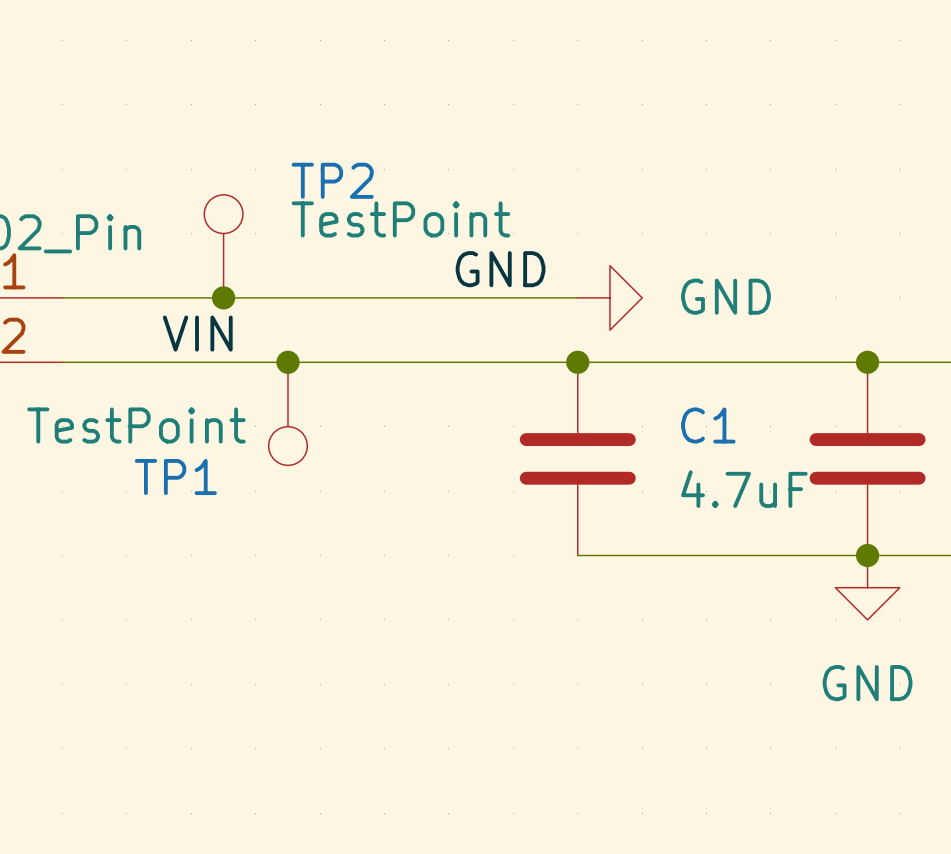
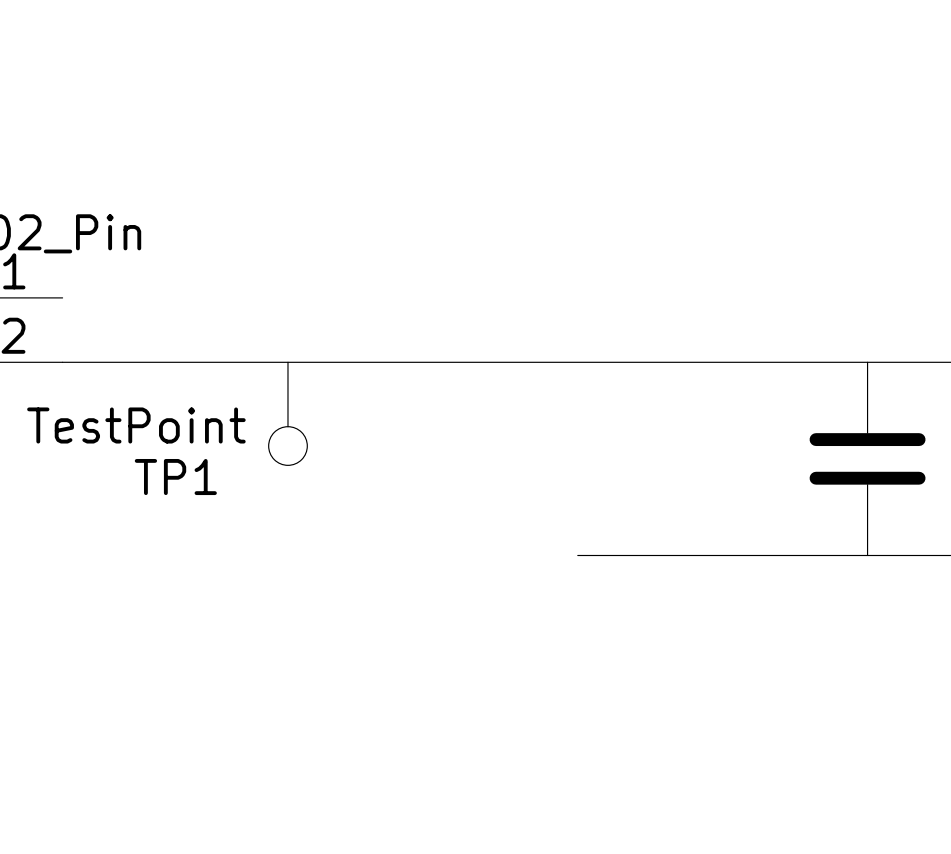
TP2: TestPoint (223, 246) -> none
label: GND (500, 269) -> none
wire: (62, 297) (577, 297) -> none
junction: (223, 297) -> none
power symbol: GND (609, 297) -> none
label: VIN (197, 333) -> none
junction: (287, 362) -> none
junction: (577, 362) -> none
junction: (867, 362) -> none
C1: 4.7uF (577, 458) -> none
junction: (867, 555) -> none
power symbol: GND (867, 587) -> none

